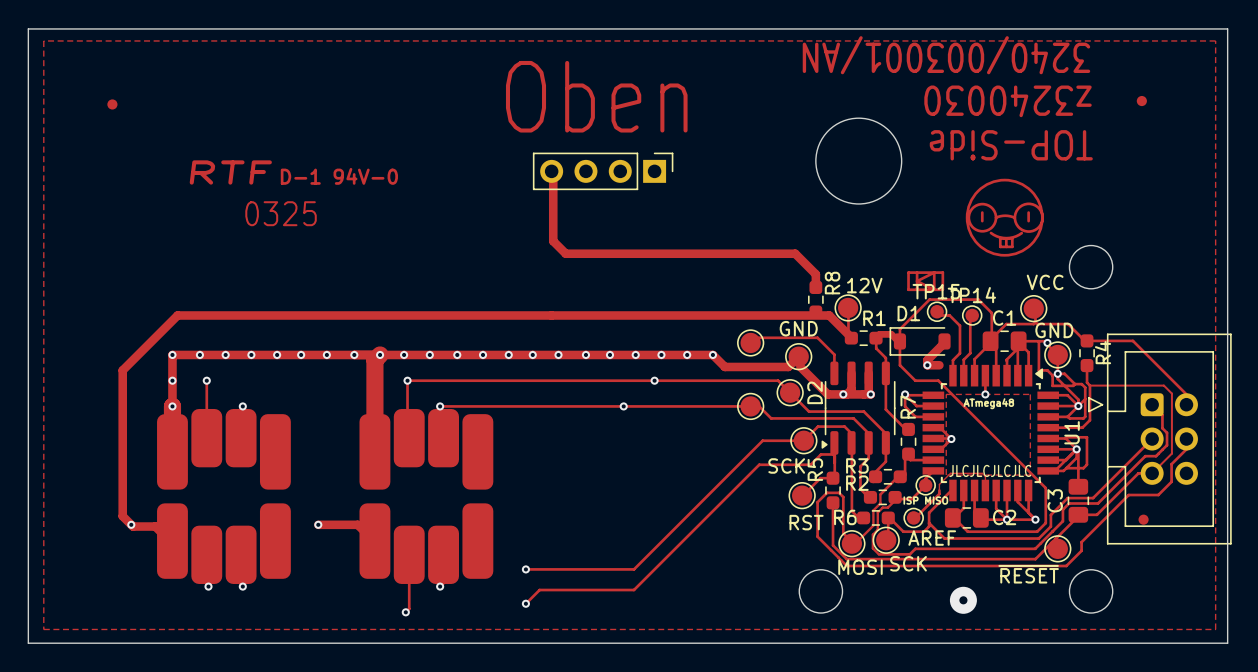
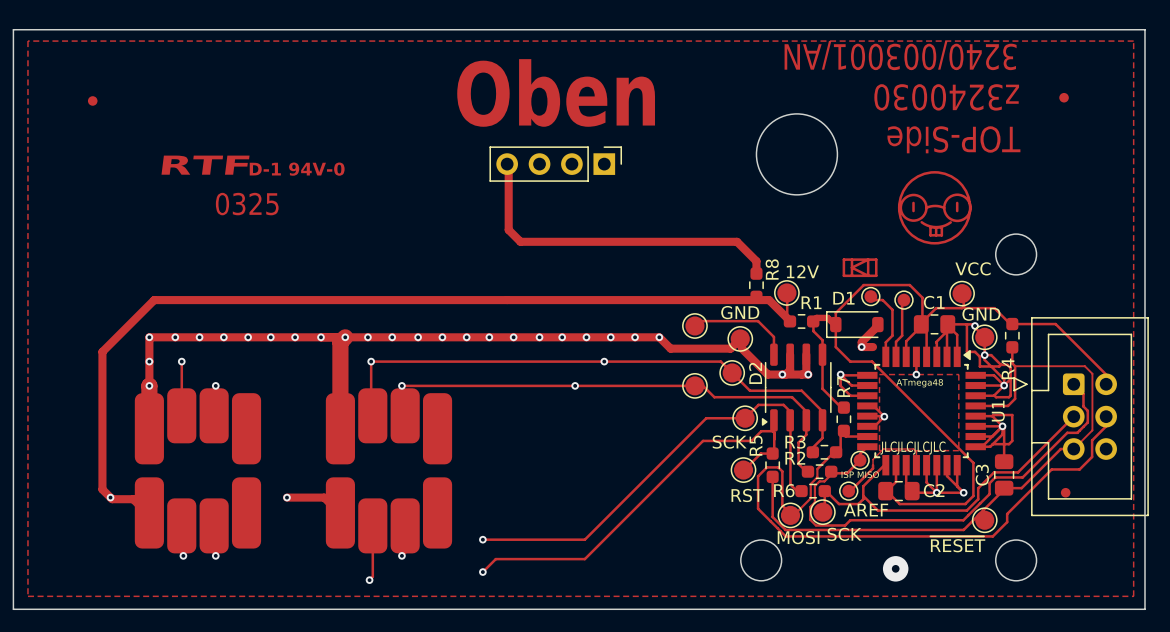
TP15 name: TP15 (936, 291) -> none
TP14 name: TP14 (971, 295) -> none
R4 name position: R4 (1103, 352) -> R4 (1008, 368)

